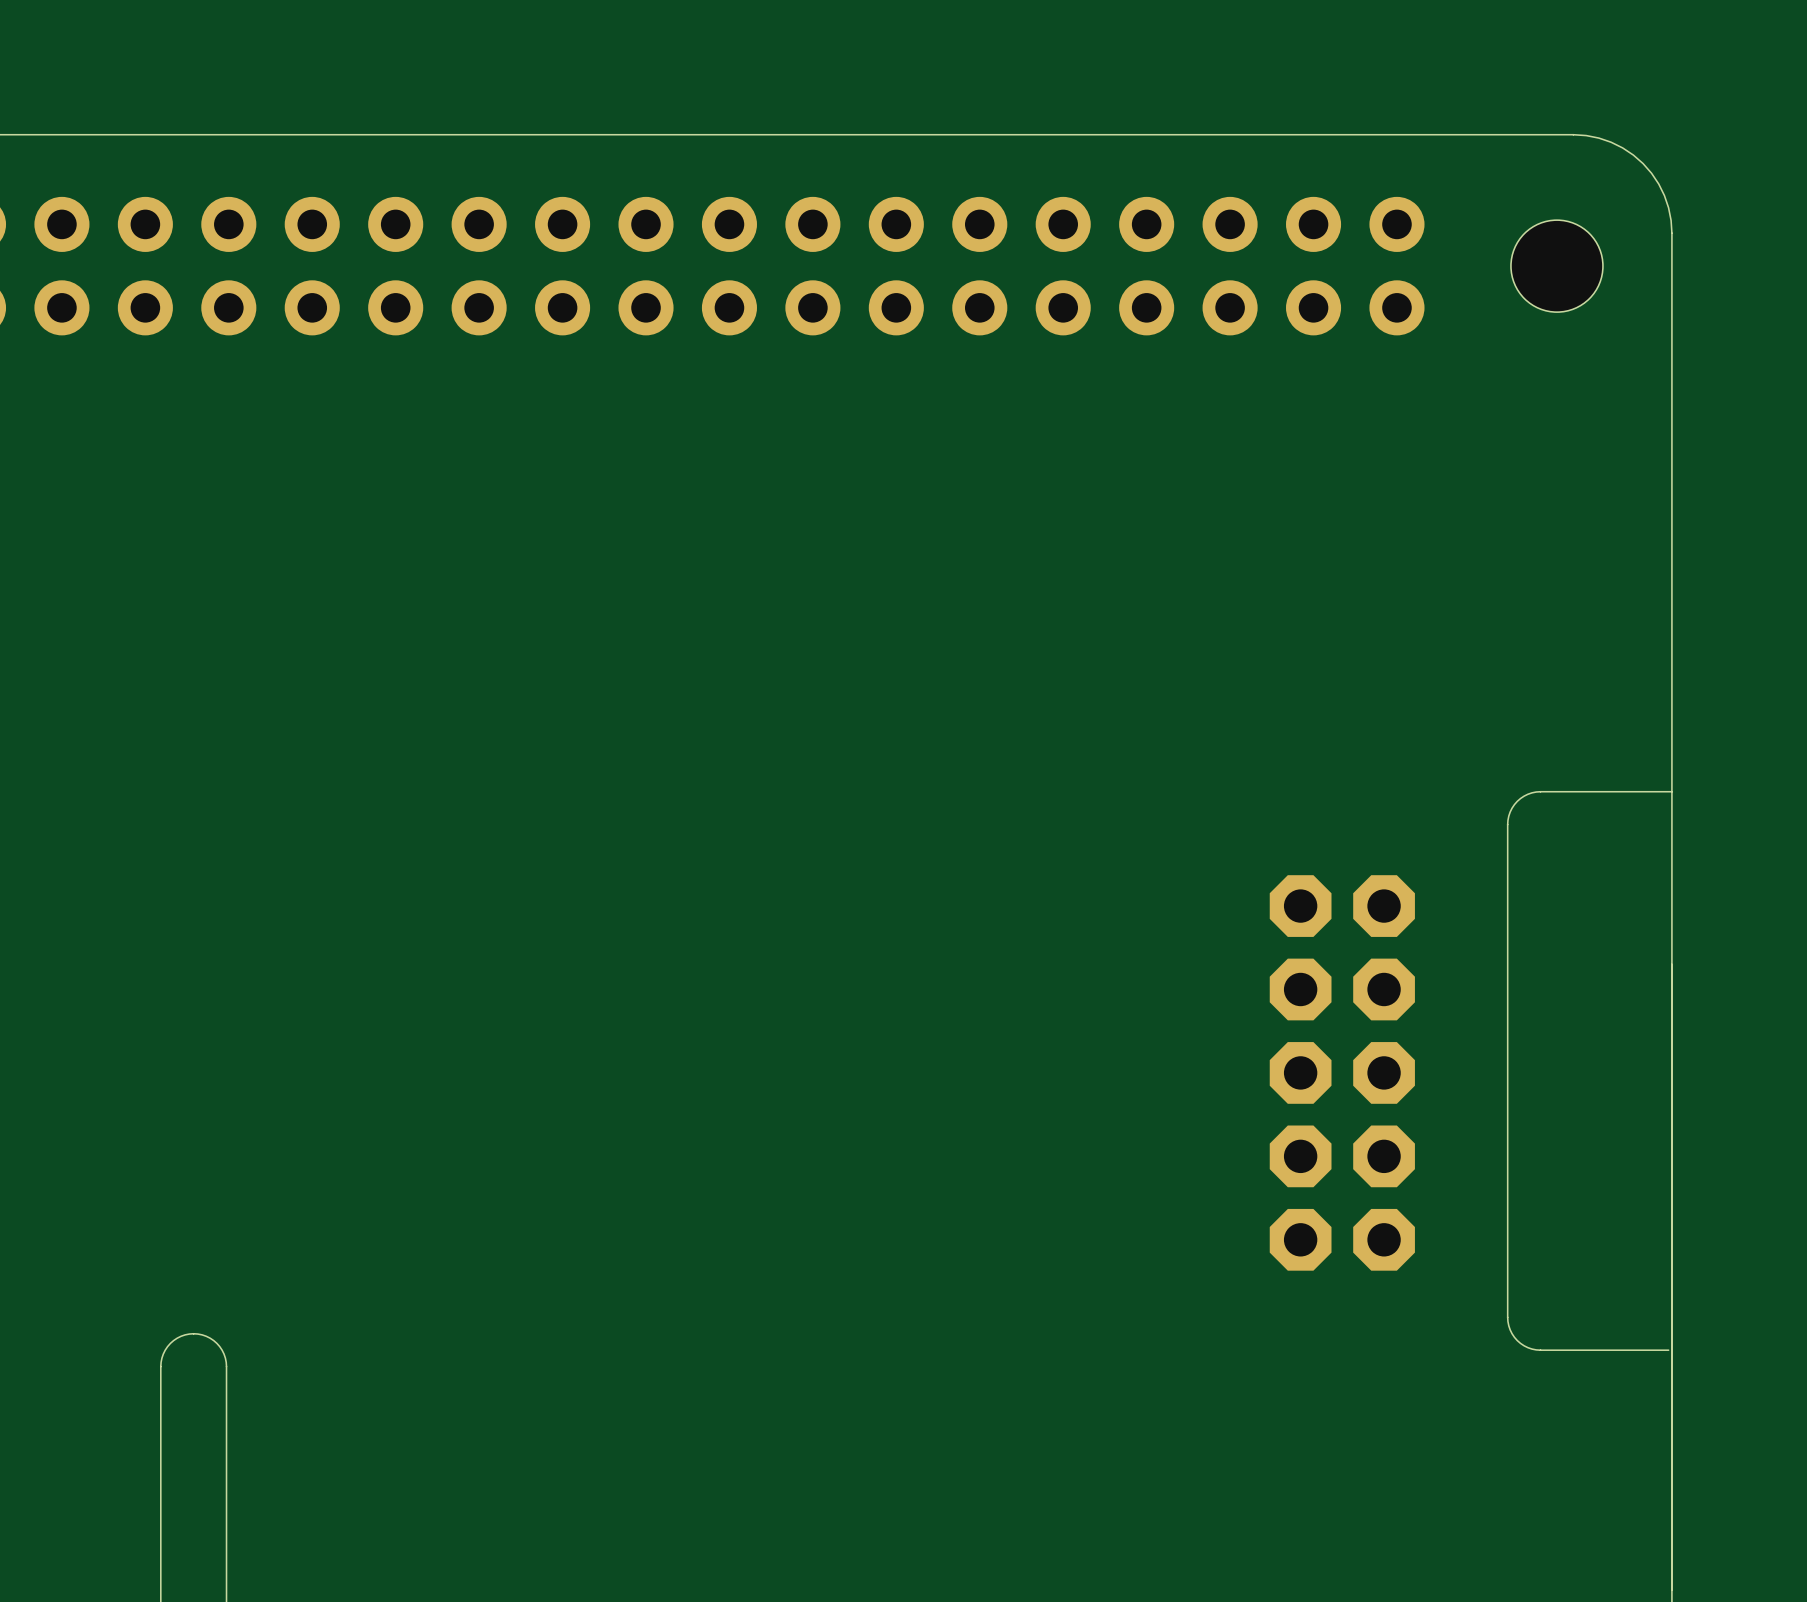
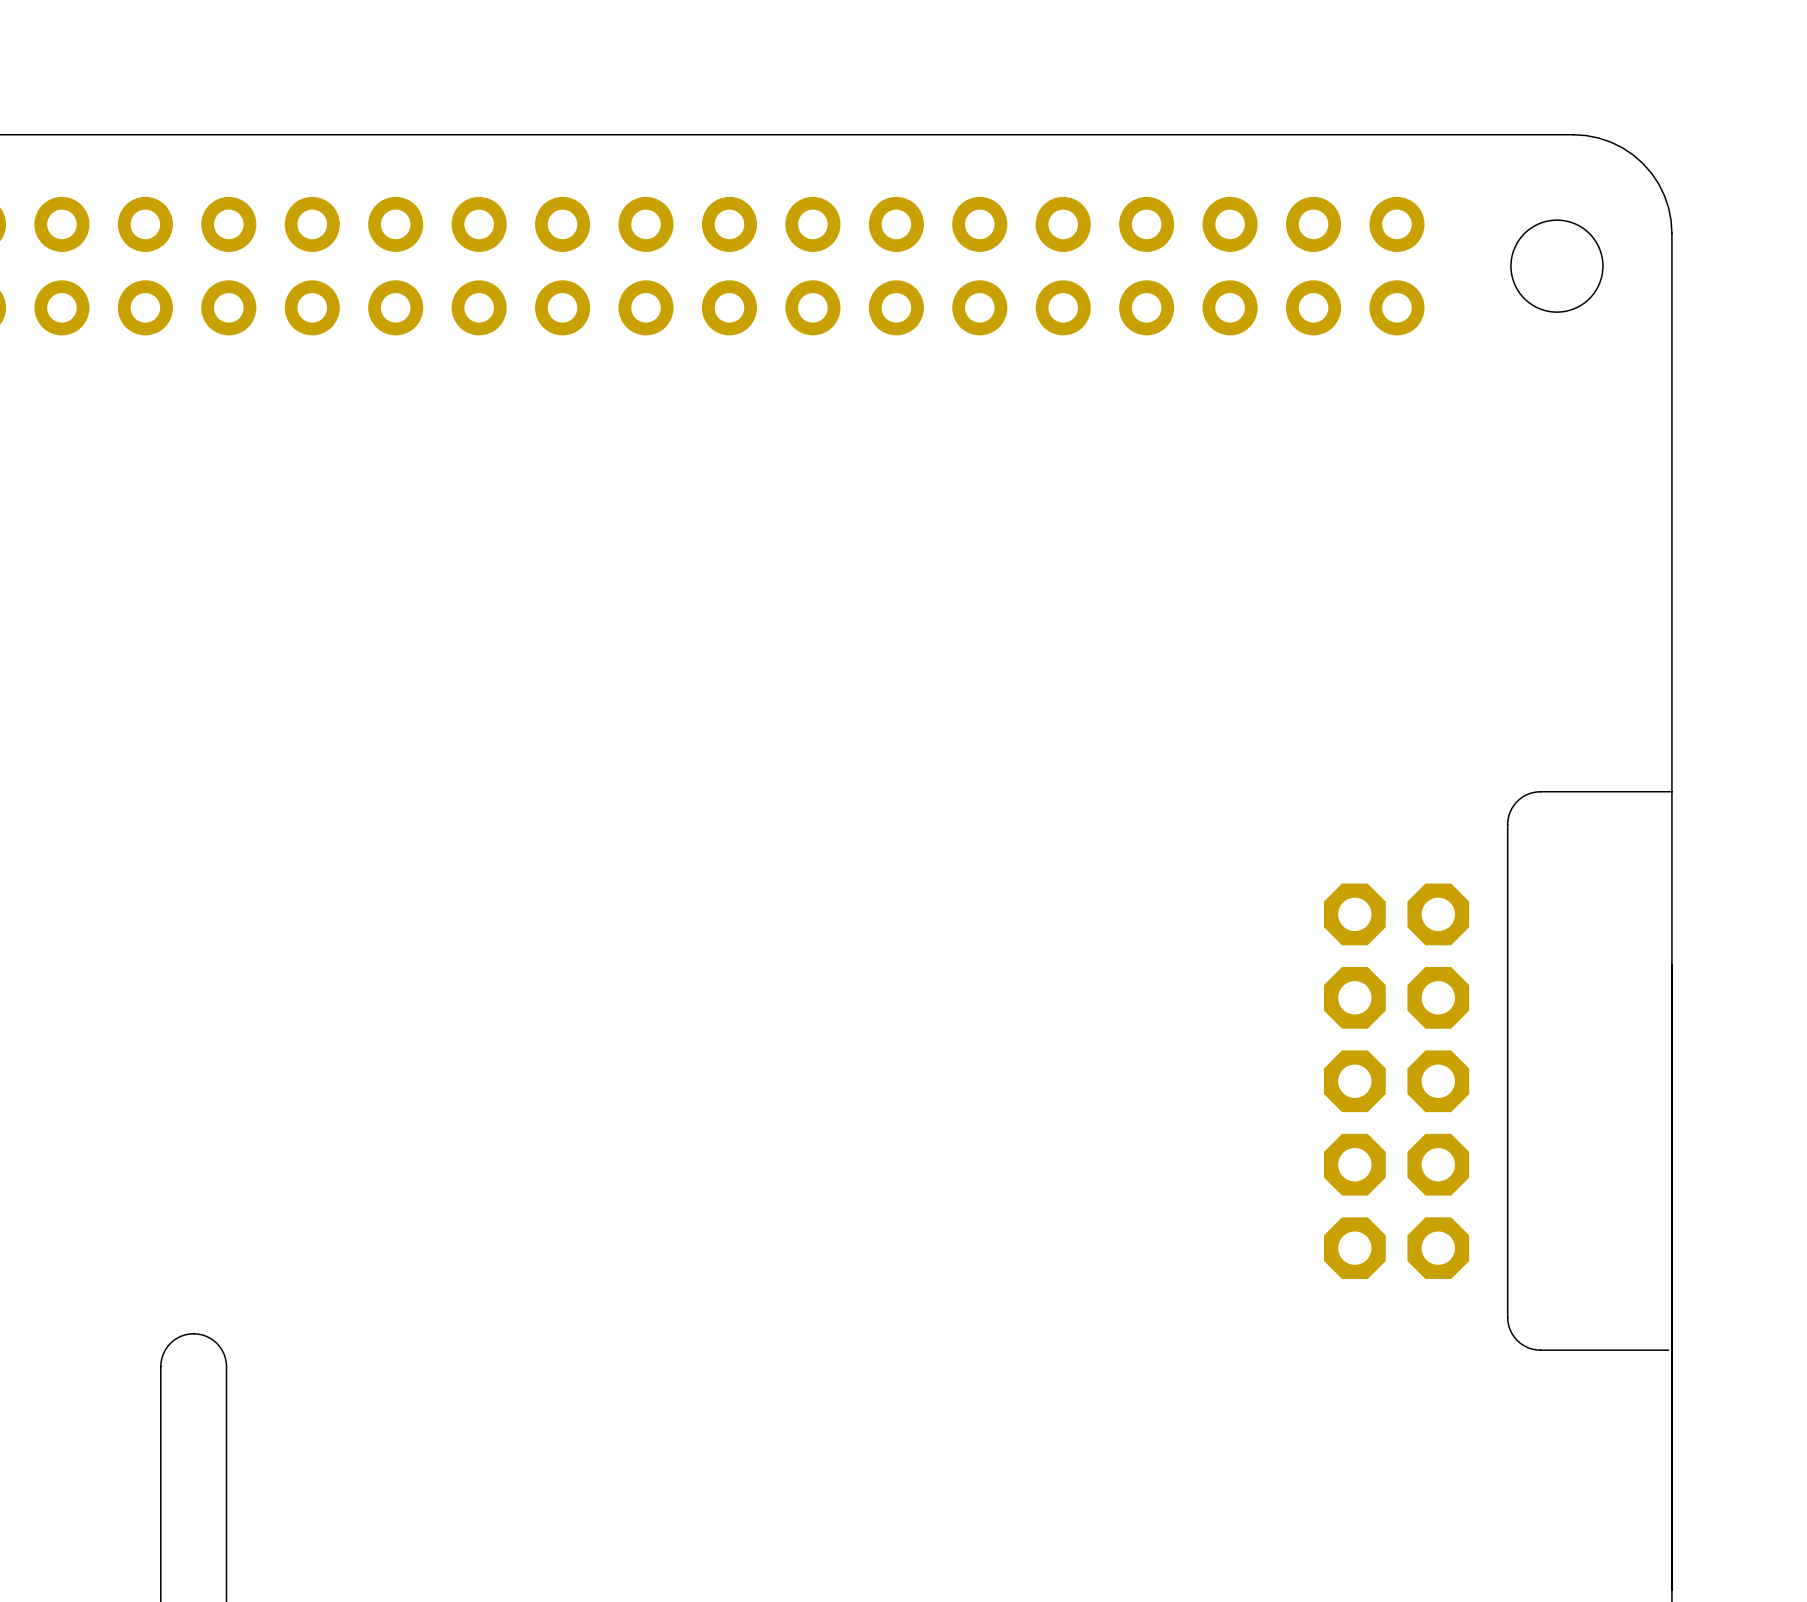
part position: (1342, 1072) -> (1396, 1081)

